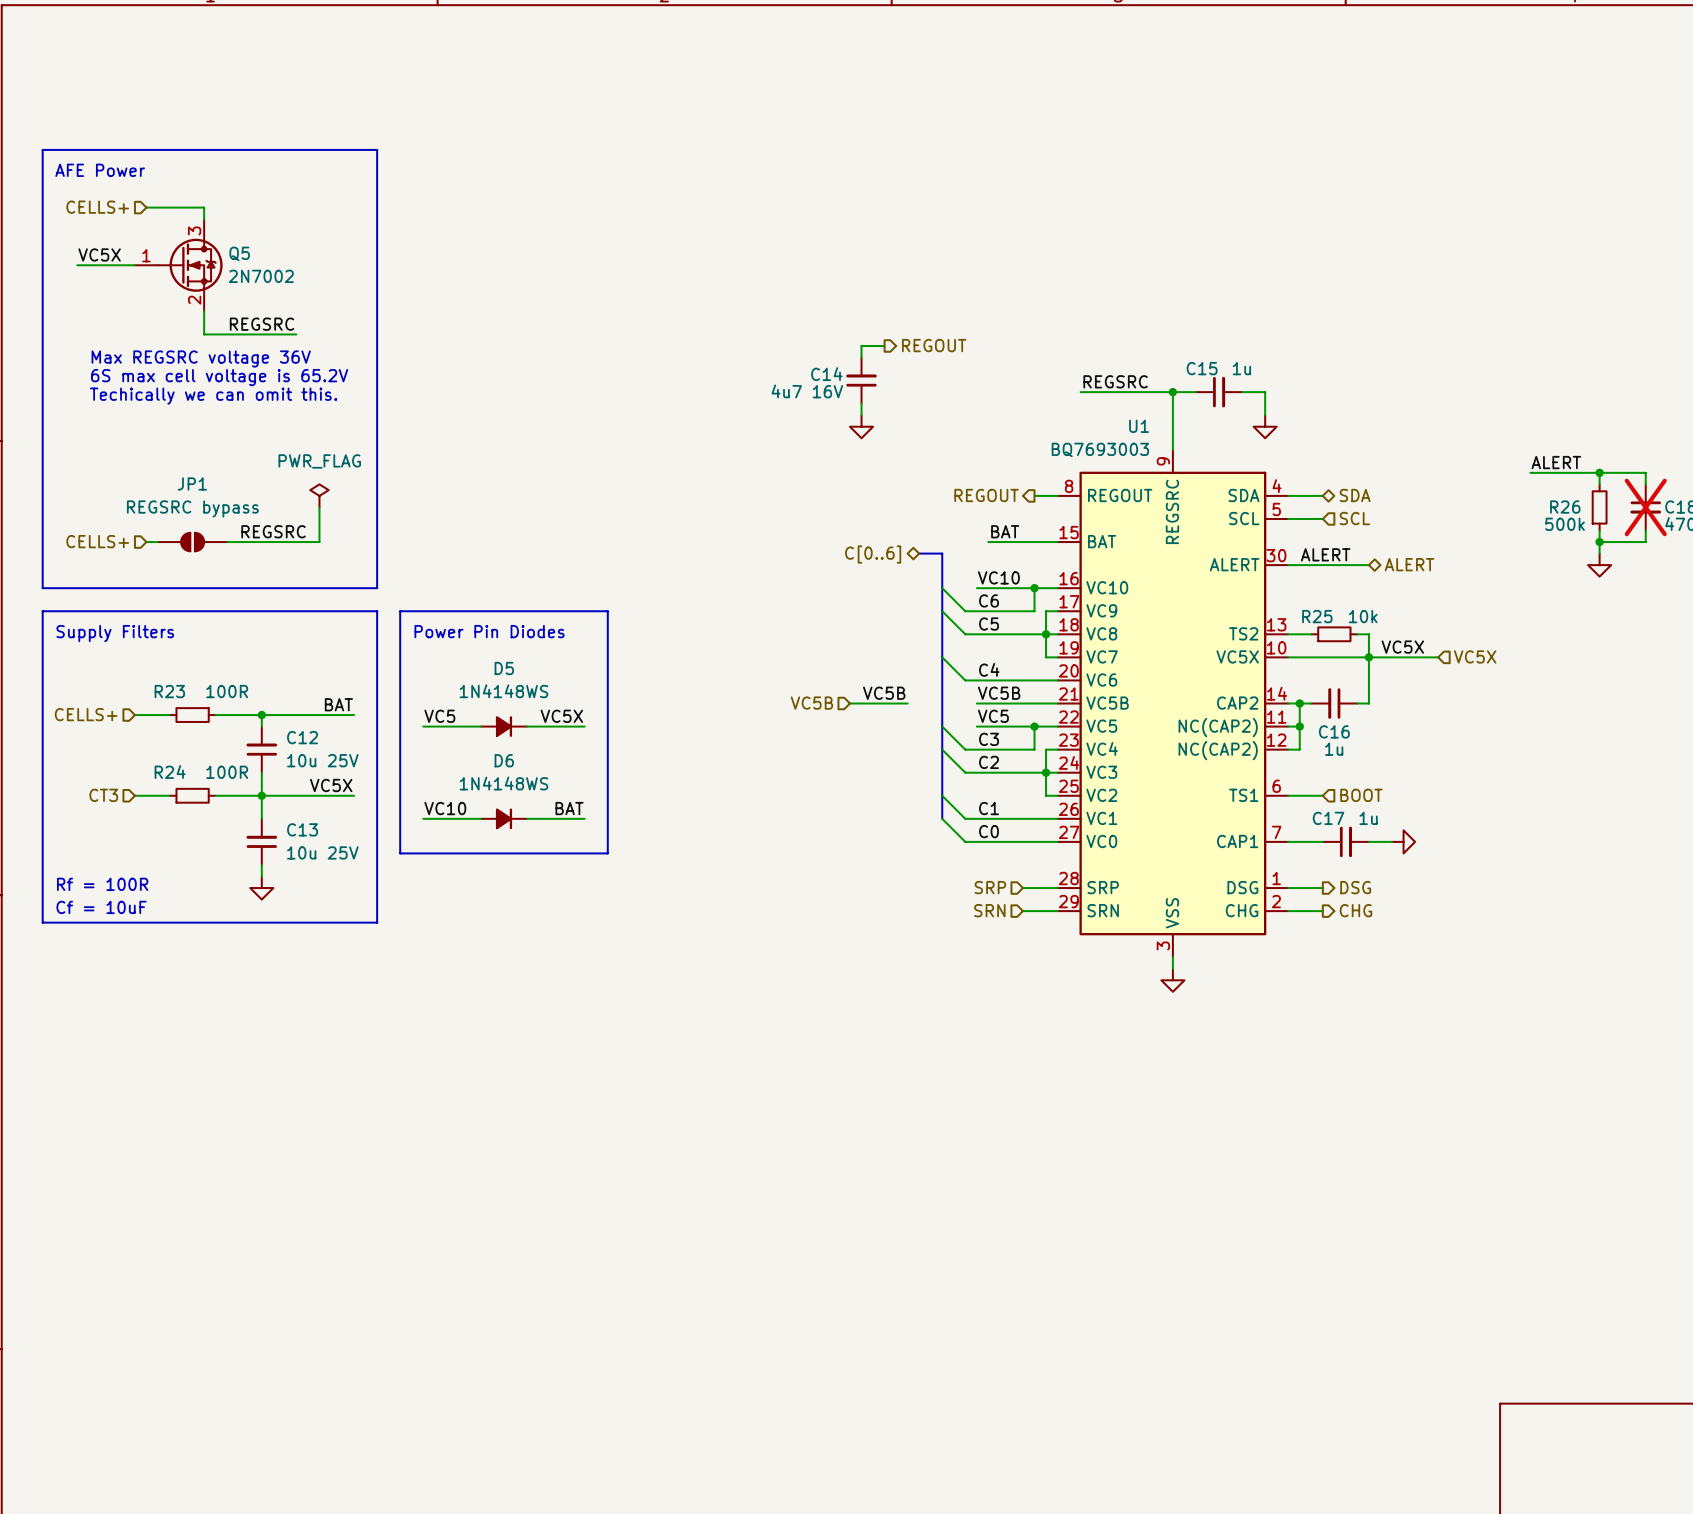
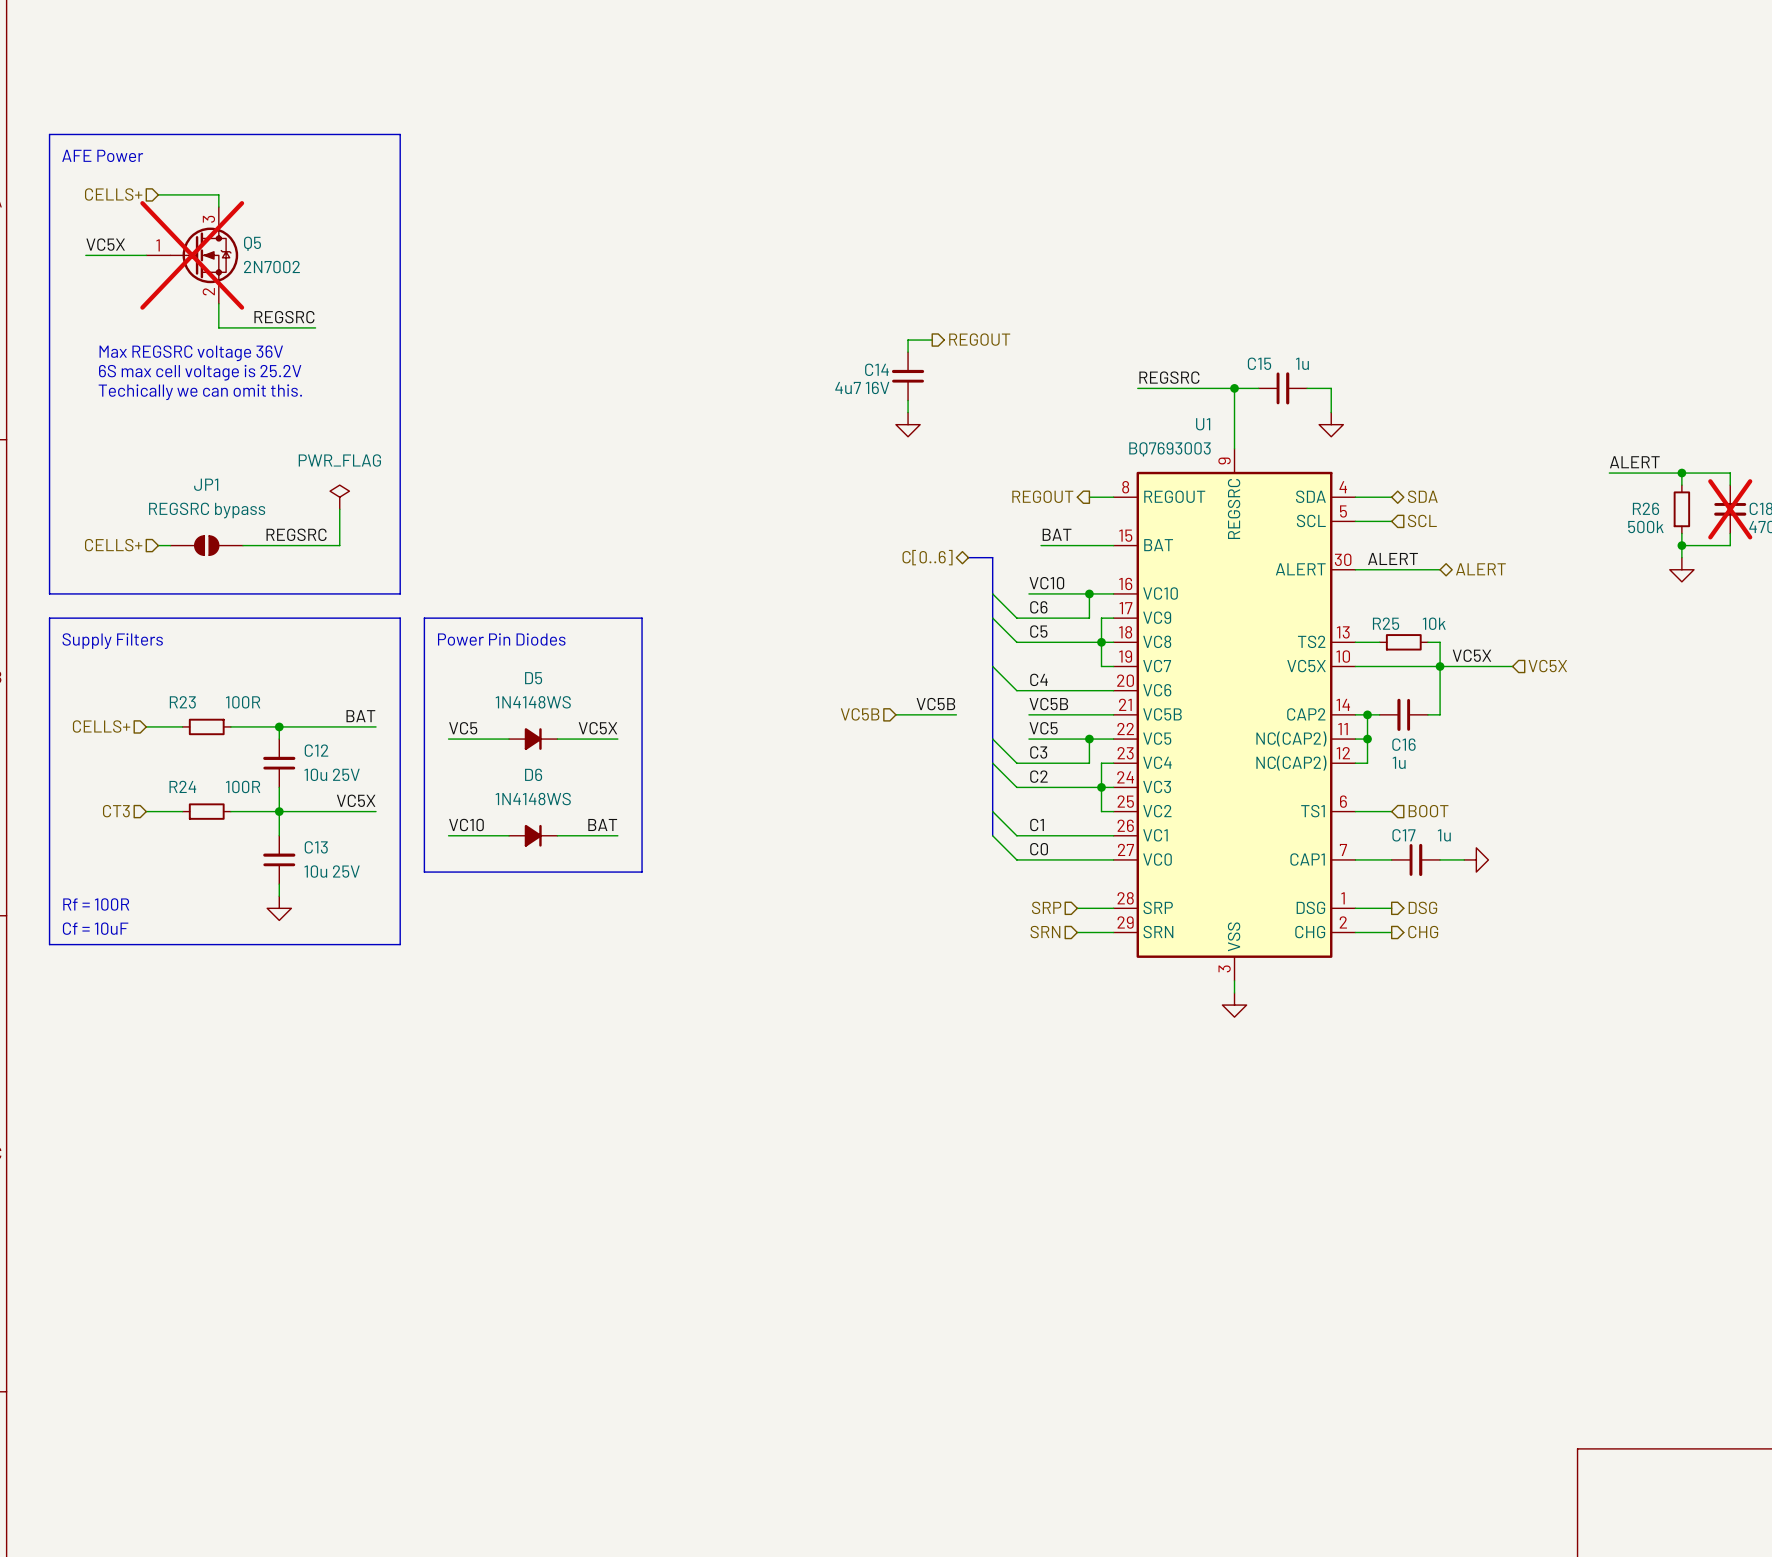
Q5 do-not-place cross: none -> (192, 255)
text: 6S max cell voltage is 65.2V (219, 377) -> 6S max cell voltage is 25.2V (200, 372)

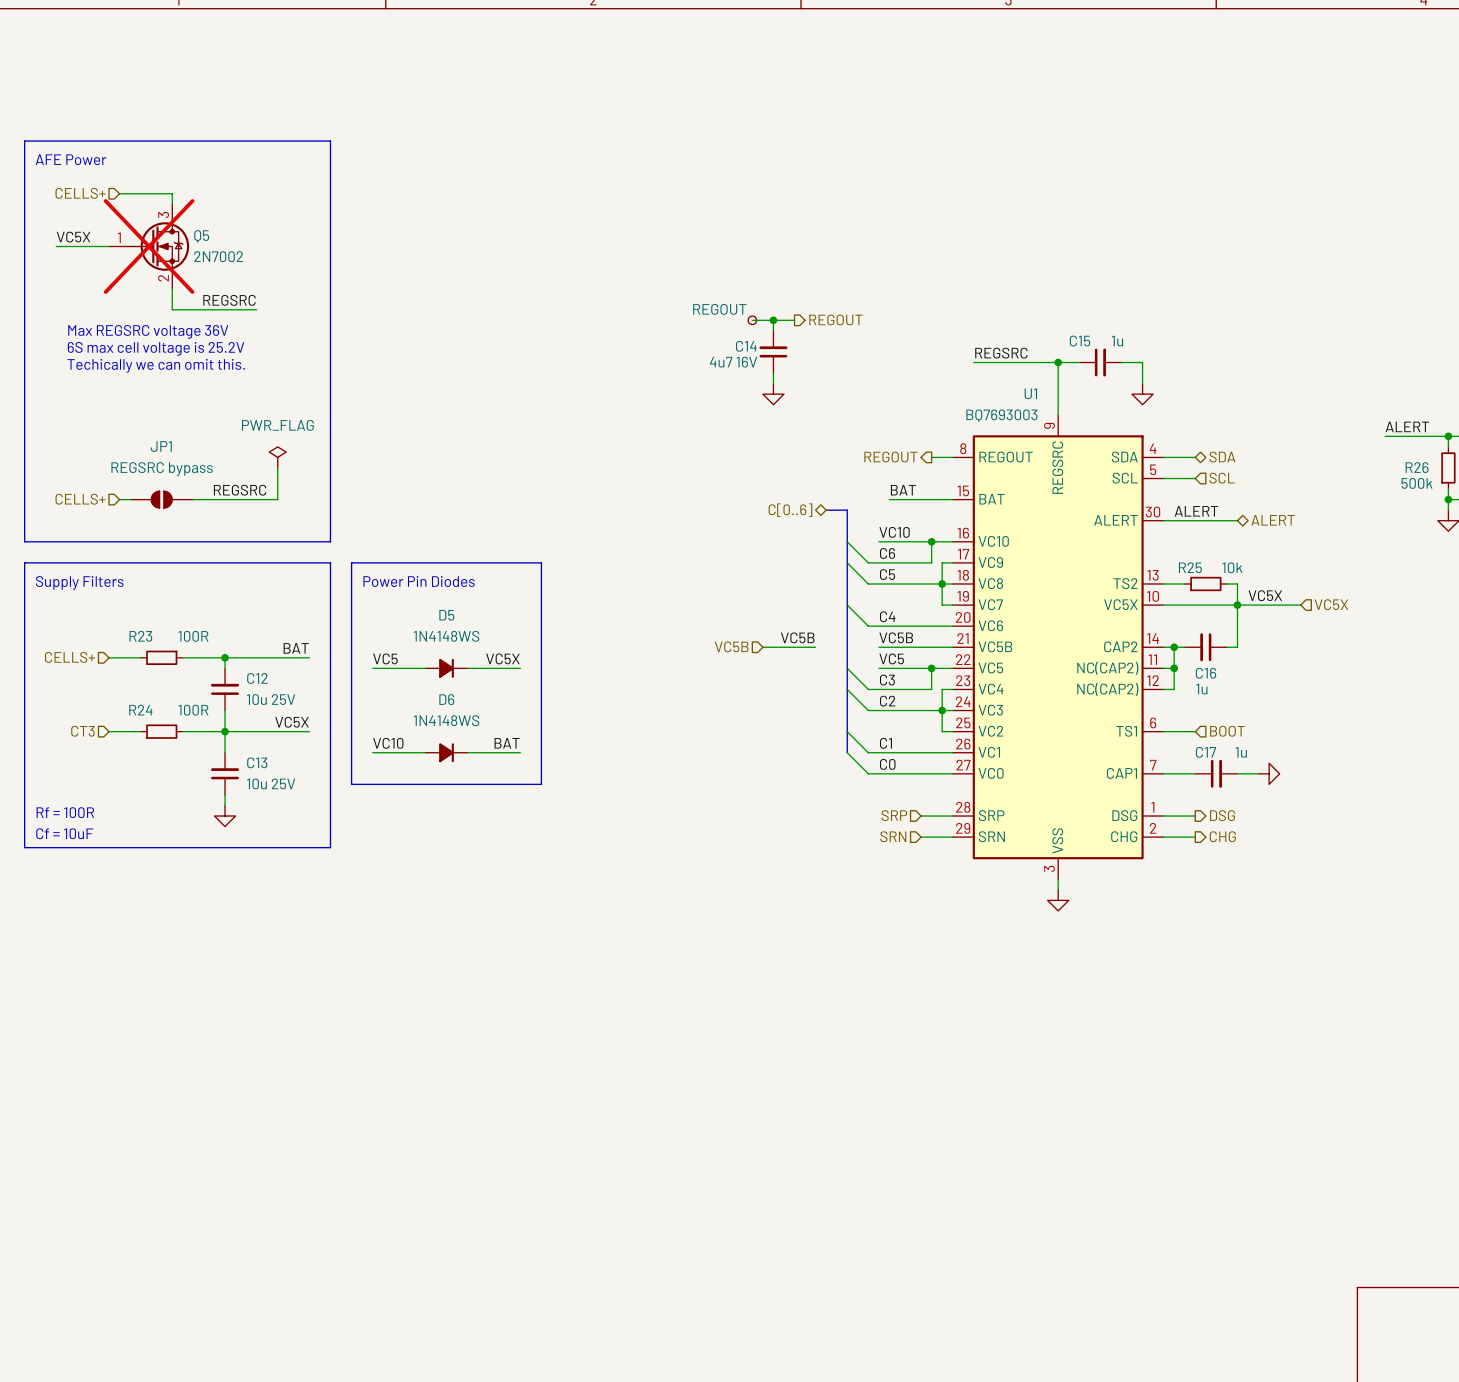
wire: none -> (752, 320) (773, 320)
part: none -> REGOUT (752, 320)
junction: none -> (773, 320)

